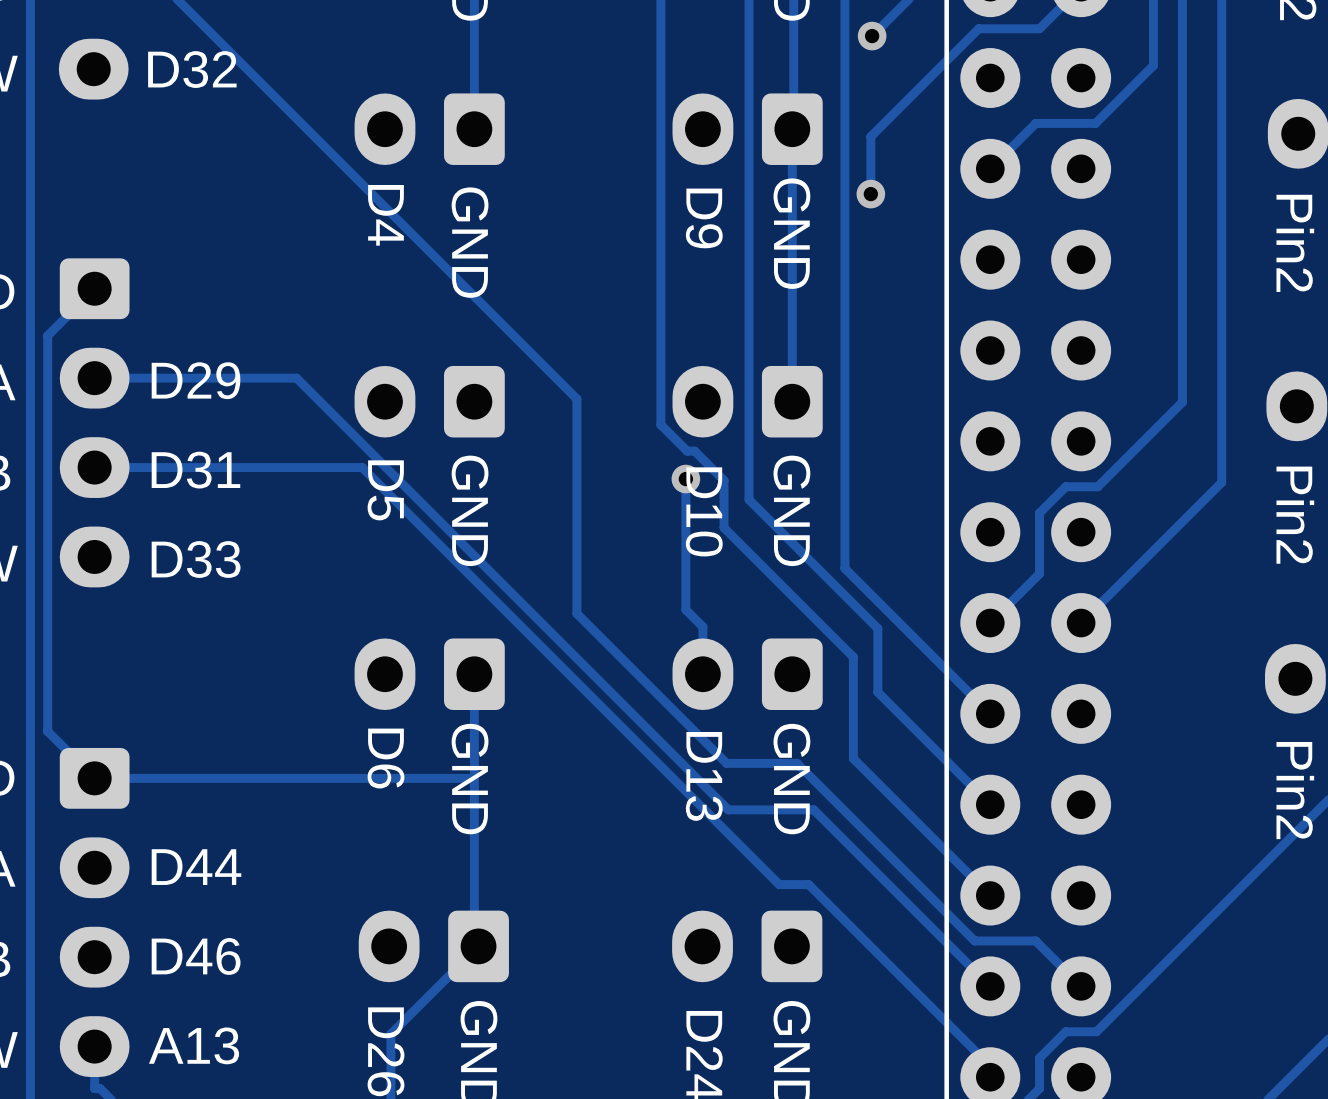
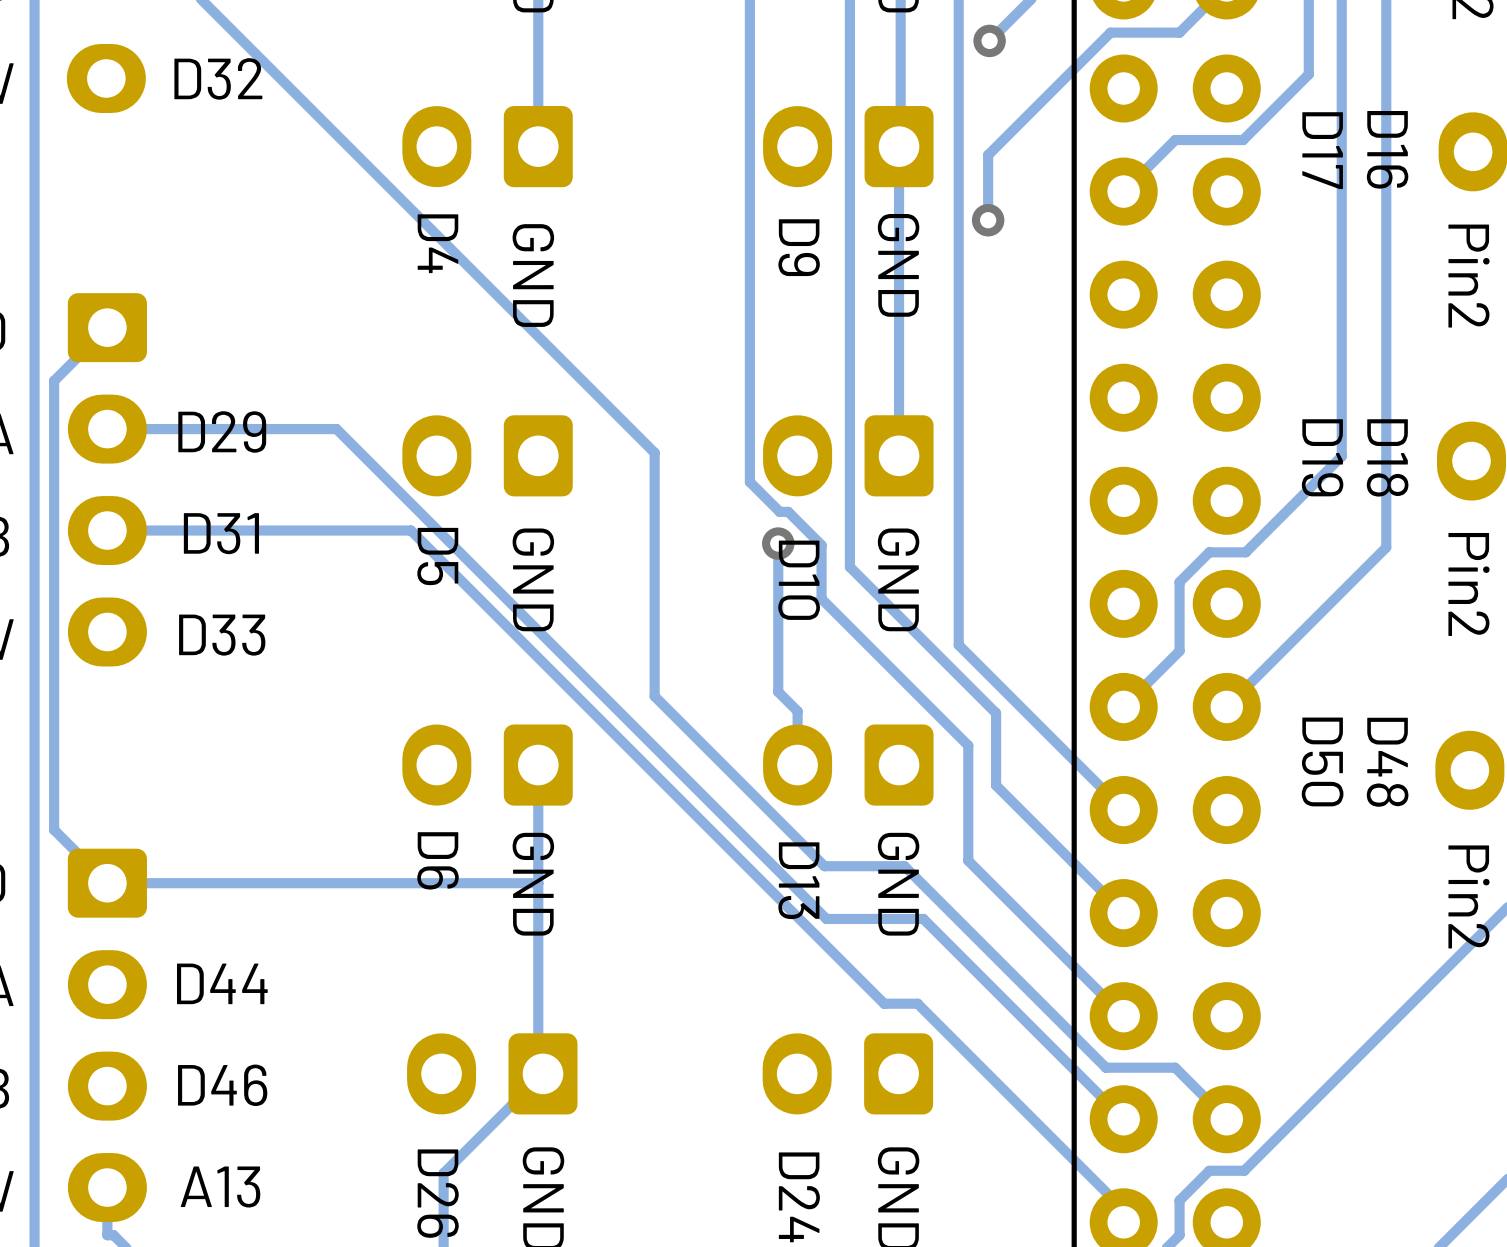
text: none -> D17 (1322, 150)
text: none -> D16 (1387, 149)
text: none -> D19 (1322, 457)
text: none -> D18 (1387, 457)
text: none -> D48 (1387, 762)
text: none -> D50 (1322, 761)

